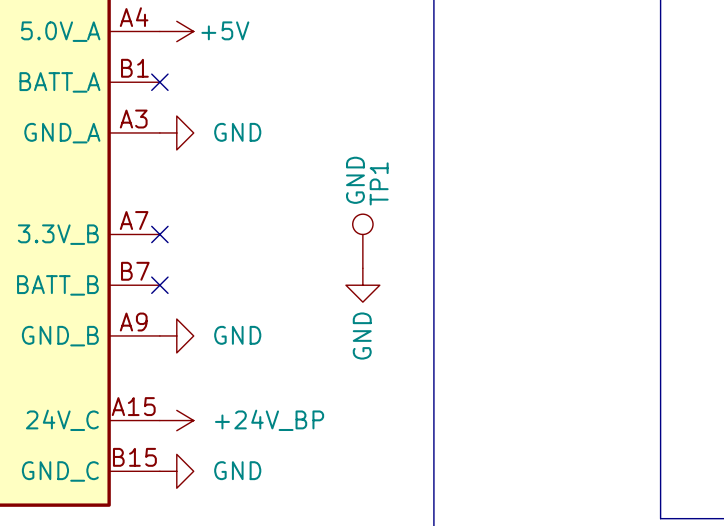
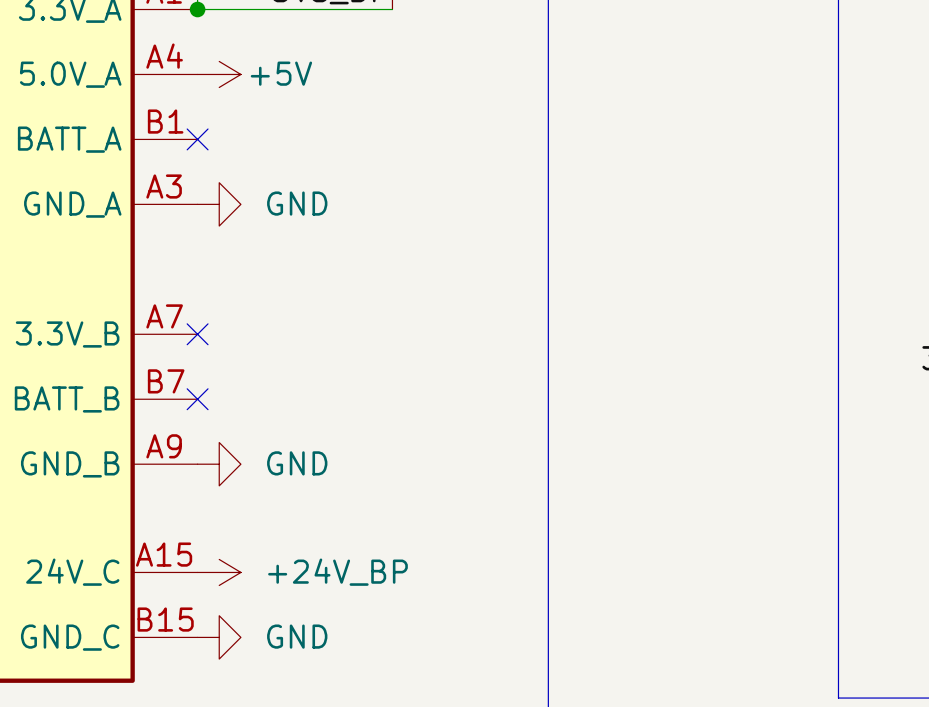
TP1: GND (362, 241) -> none
power symbol: GND (362, 285) -> none

